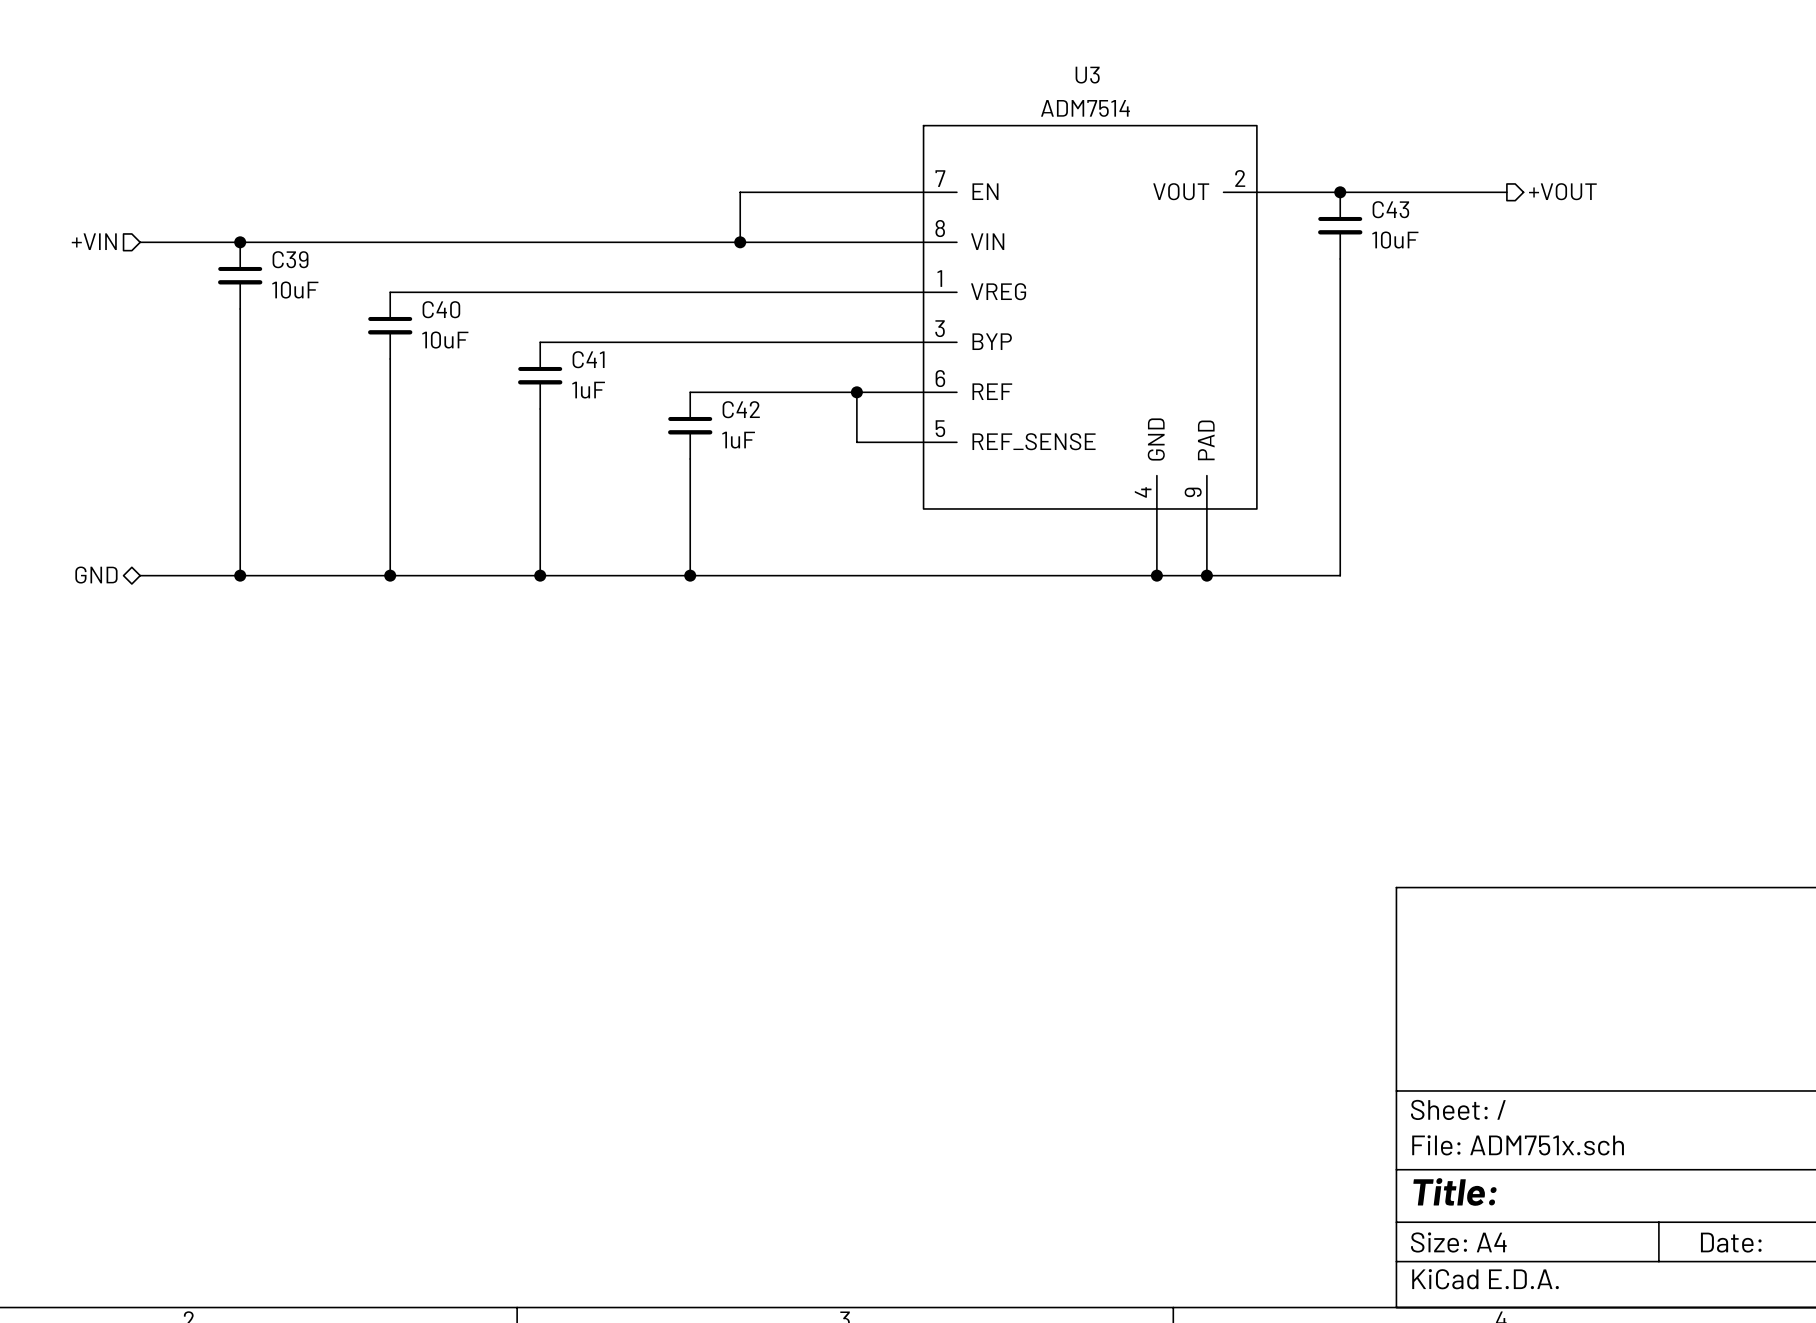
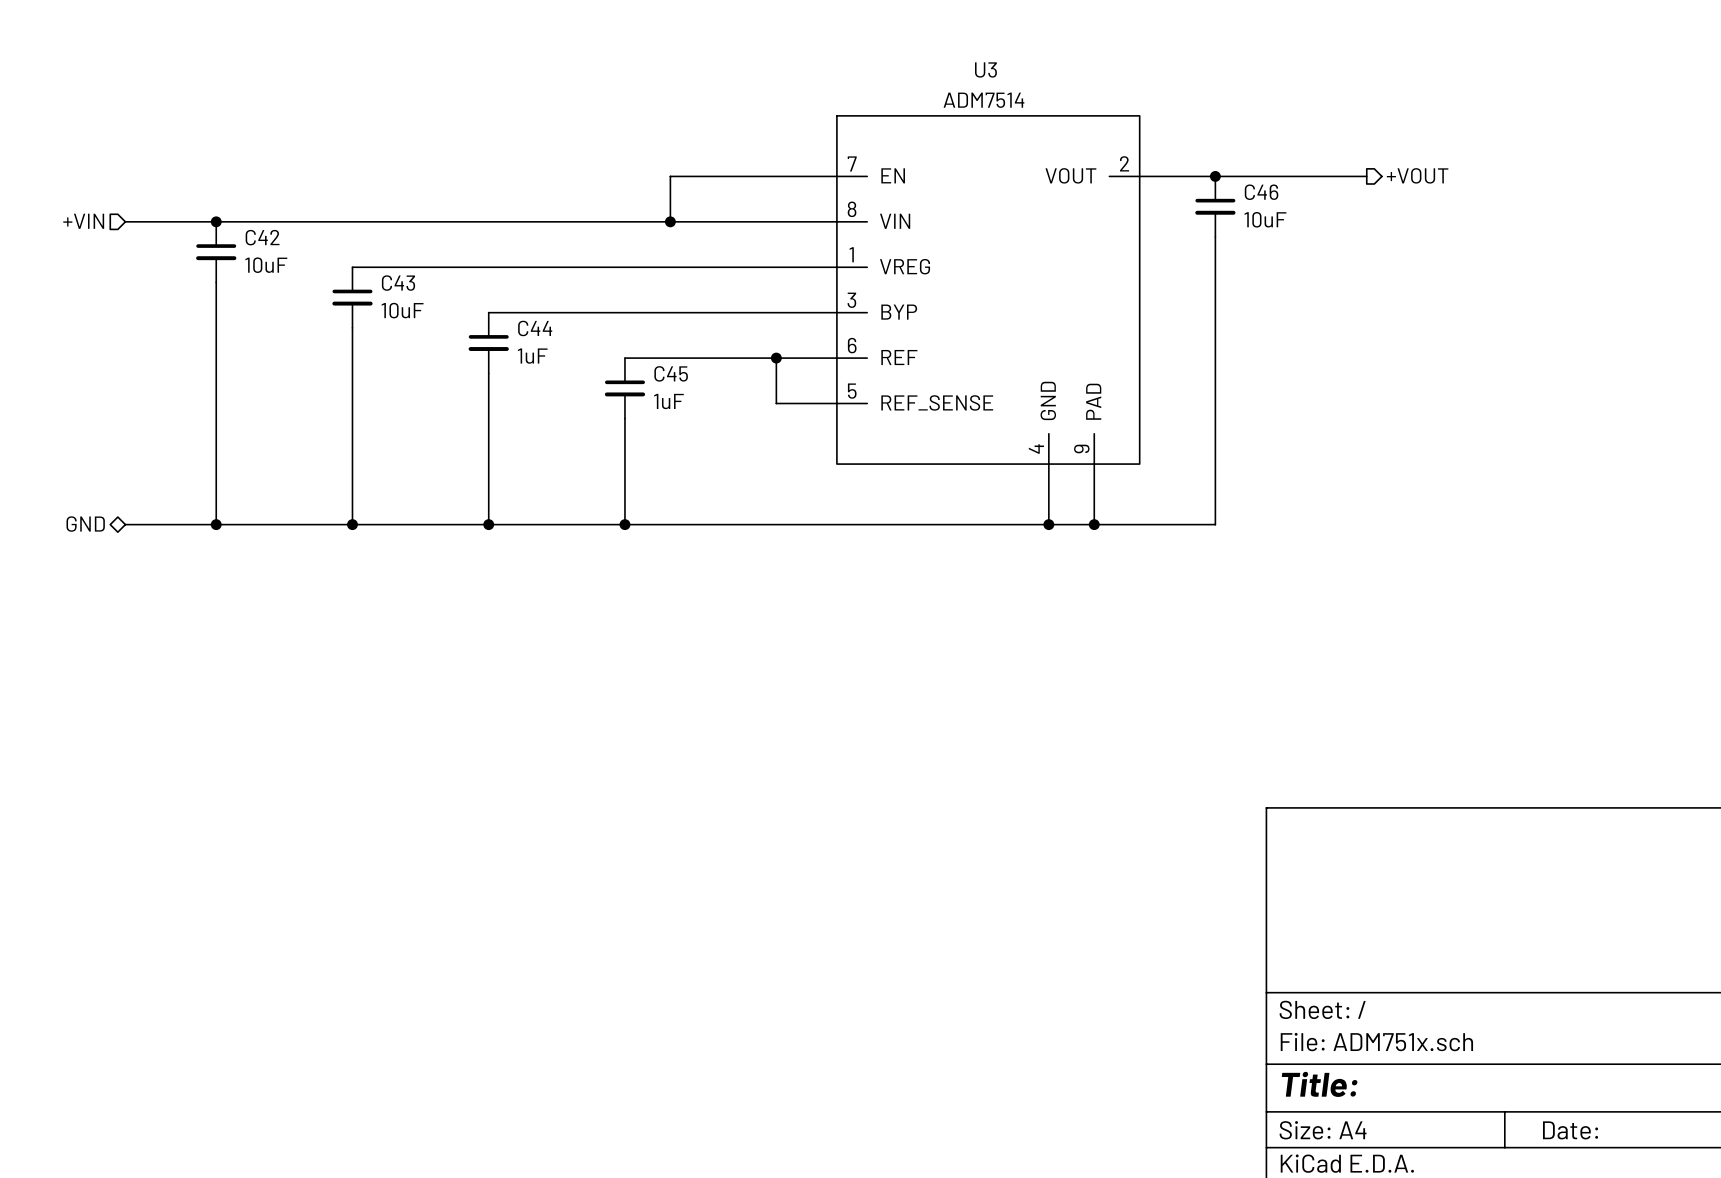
C43 name: C43 (1390, 209) -> C46 (1261, 192)
C39 name: C39 (290, 259) -> C42 (262, 237)
C40 name: C40 (441, 309) -> C43 (398, 283)
C41 name: C41 (588, 359) -> C44 (535, 328)
C42 name: C42 (741, 409) -> C45 (671, 373)

